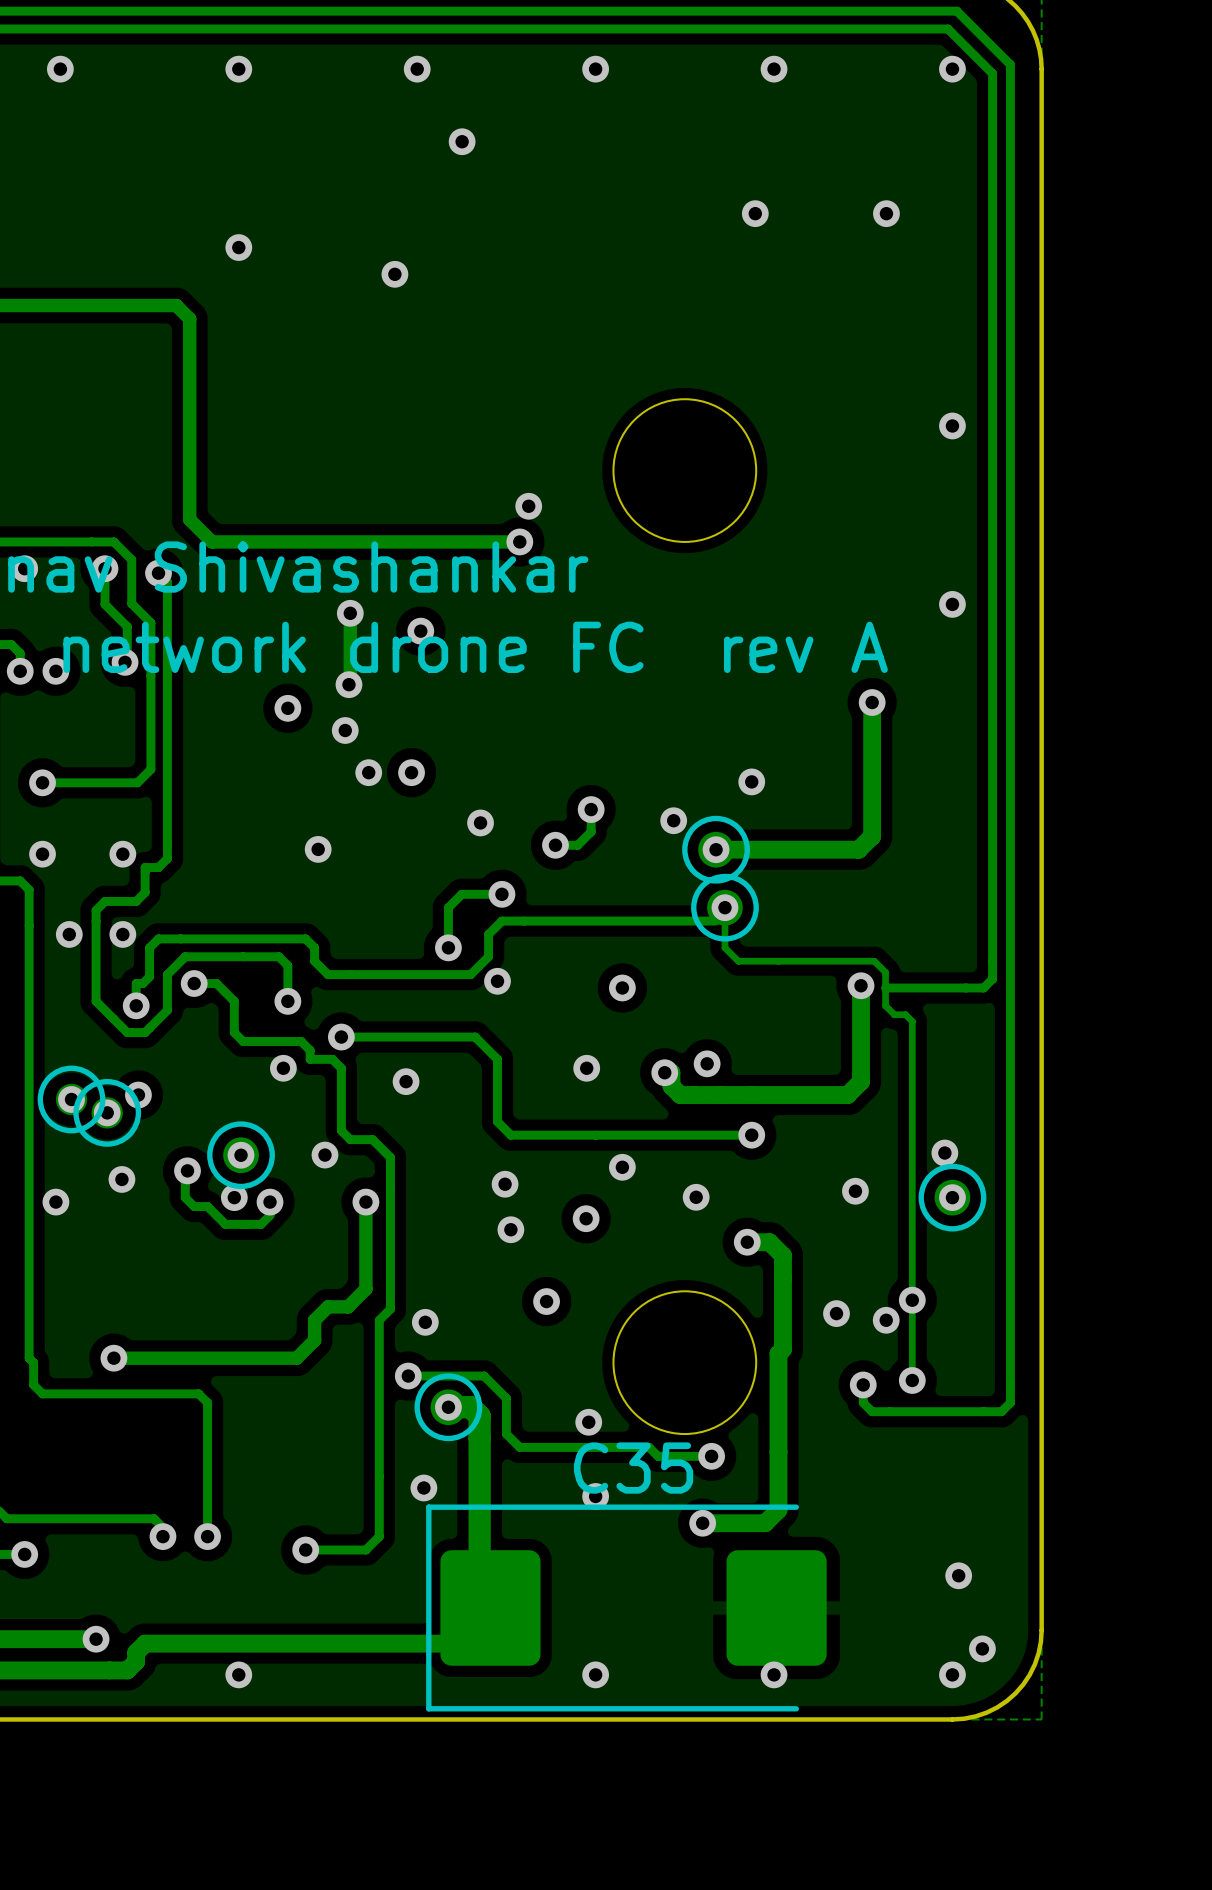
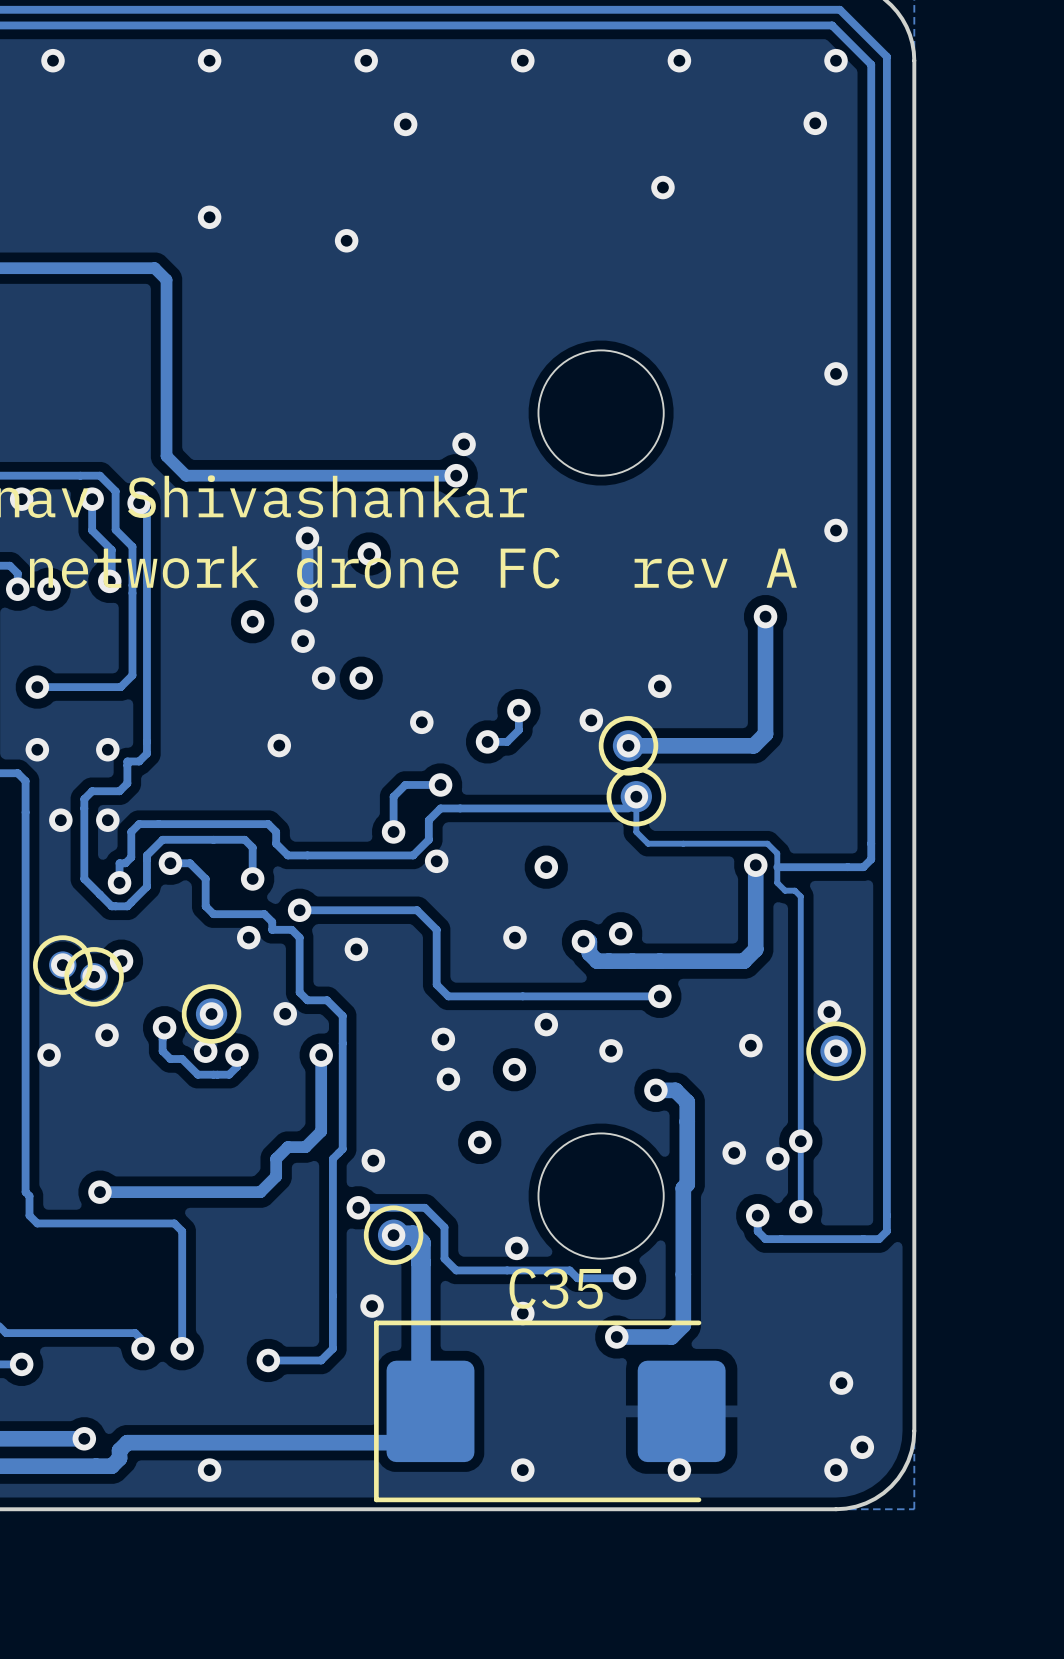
via position: (886, 213) -> (815, 123)

